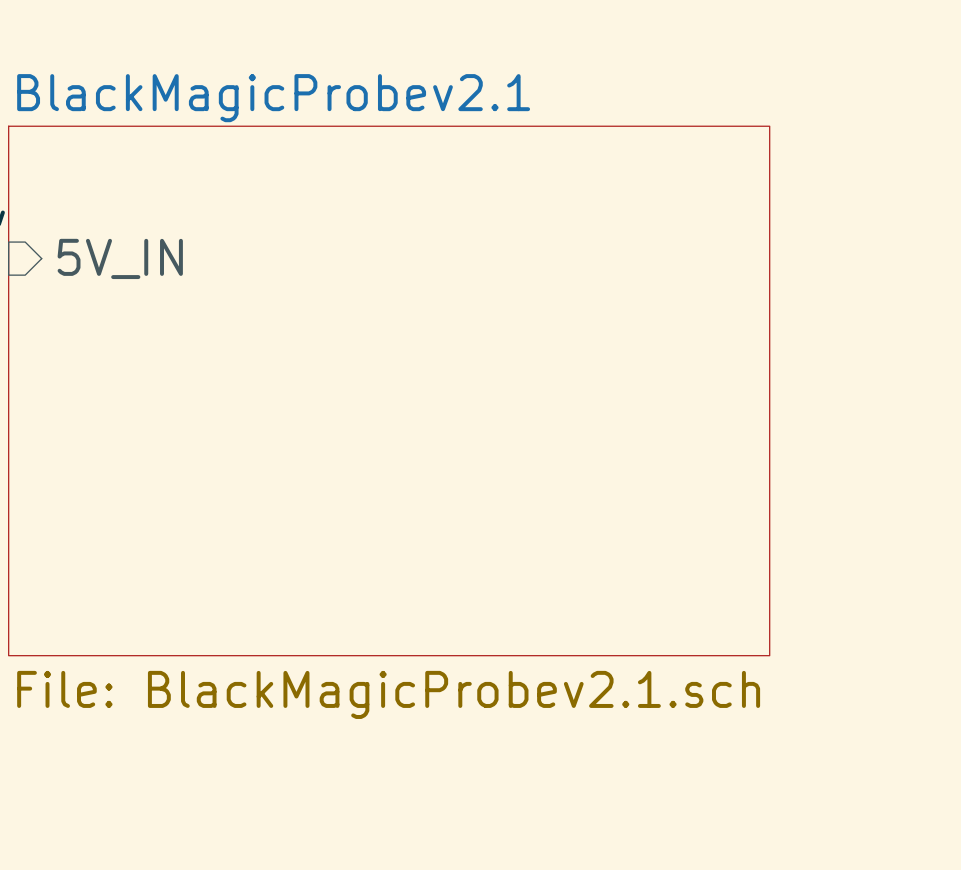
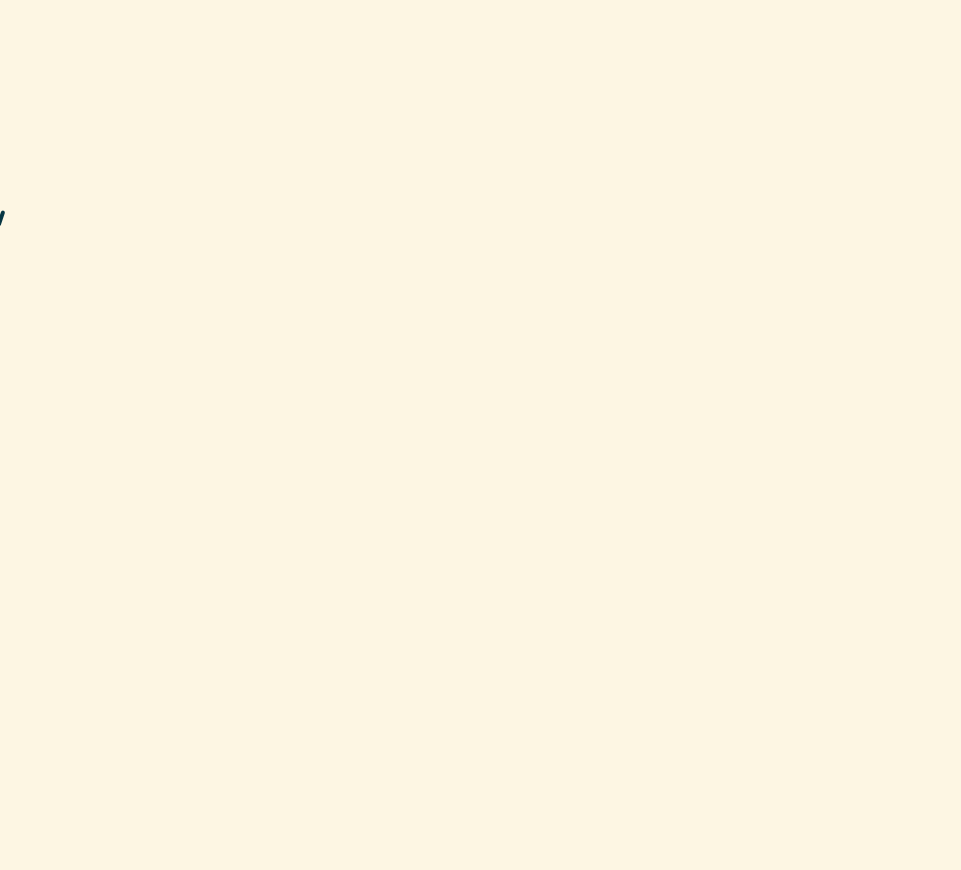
sheet pin: 5V_IN (120, 258) -> none
sheet BlackMagicProbev2.1: File: BlackMagicProbev2.1.sch (389, 390) -> none

